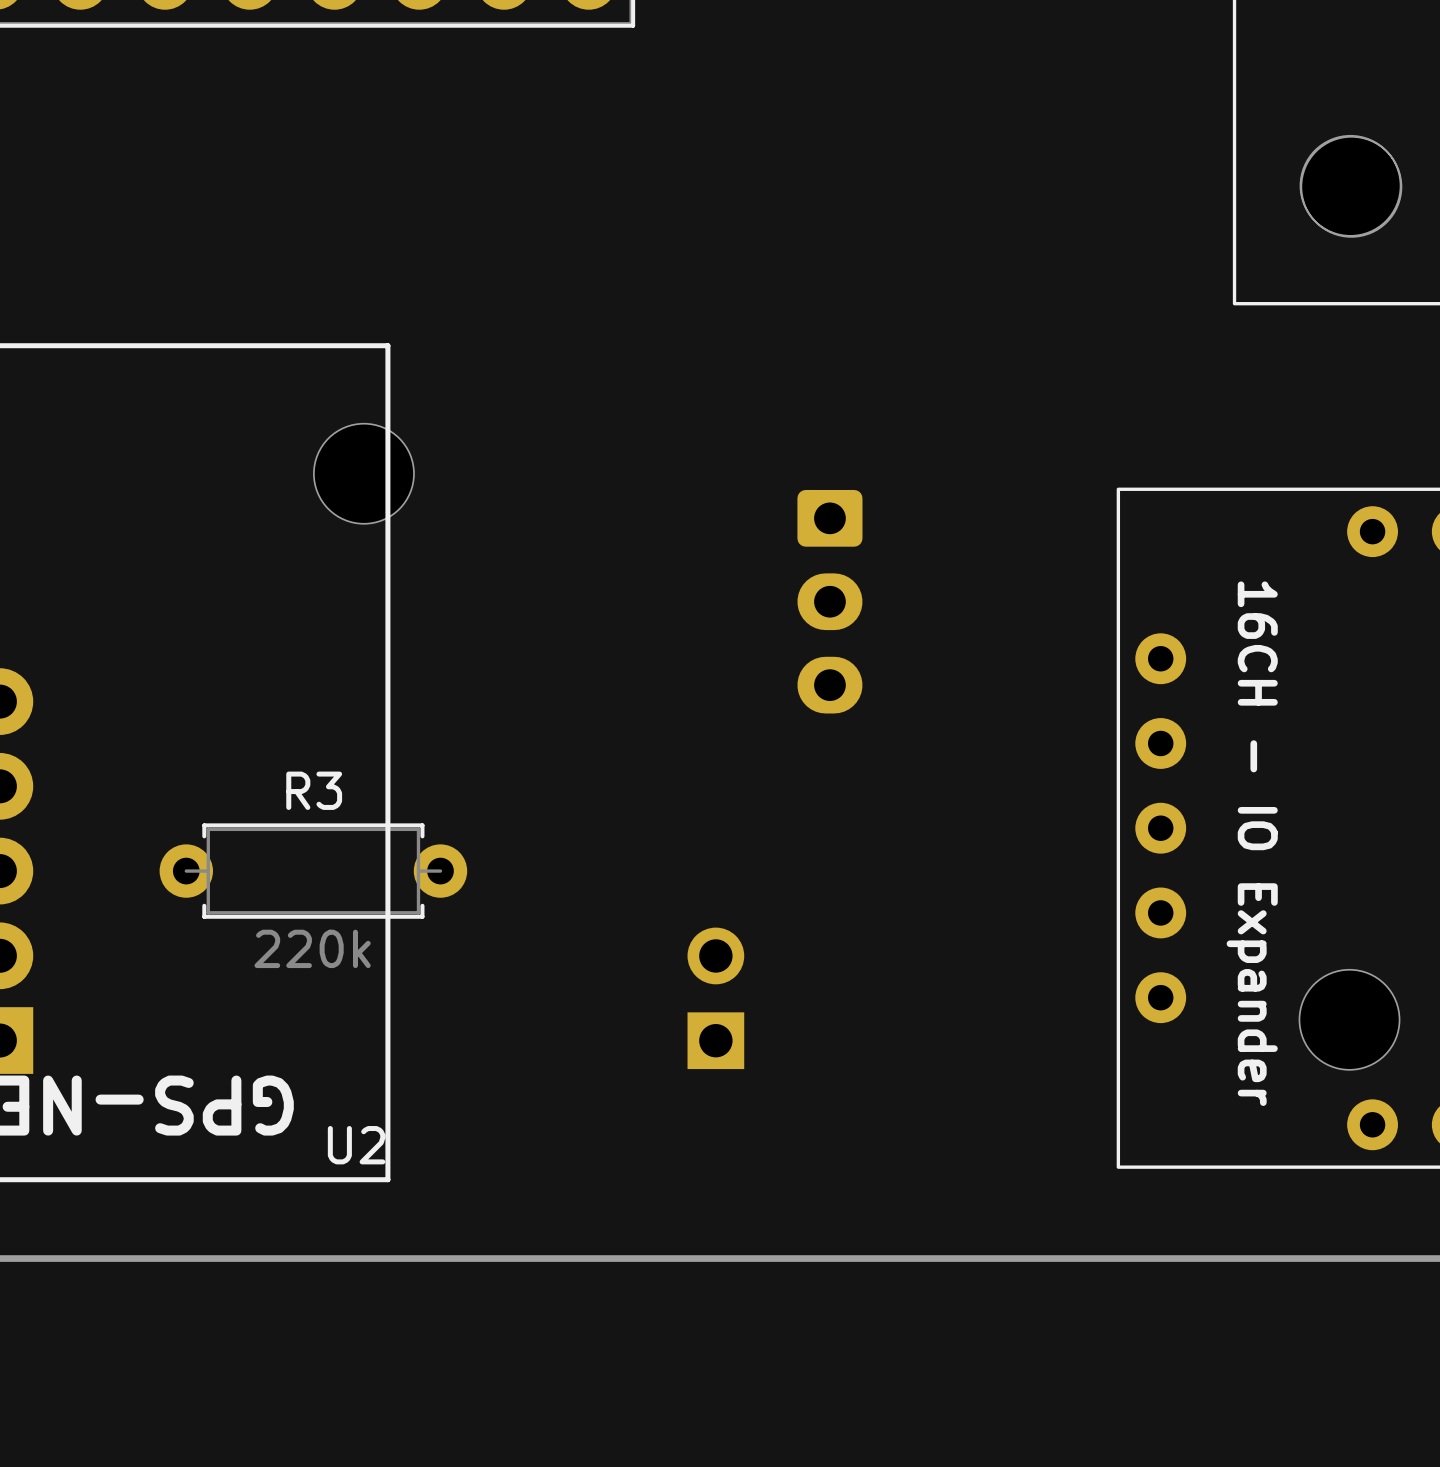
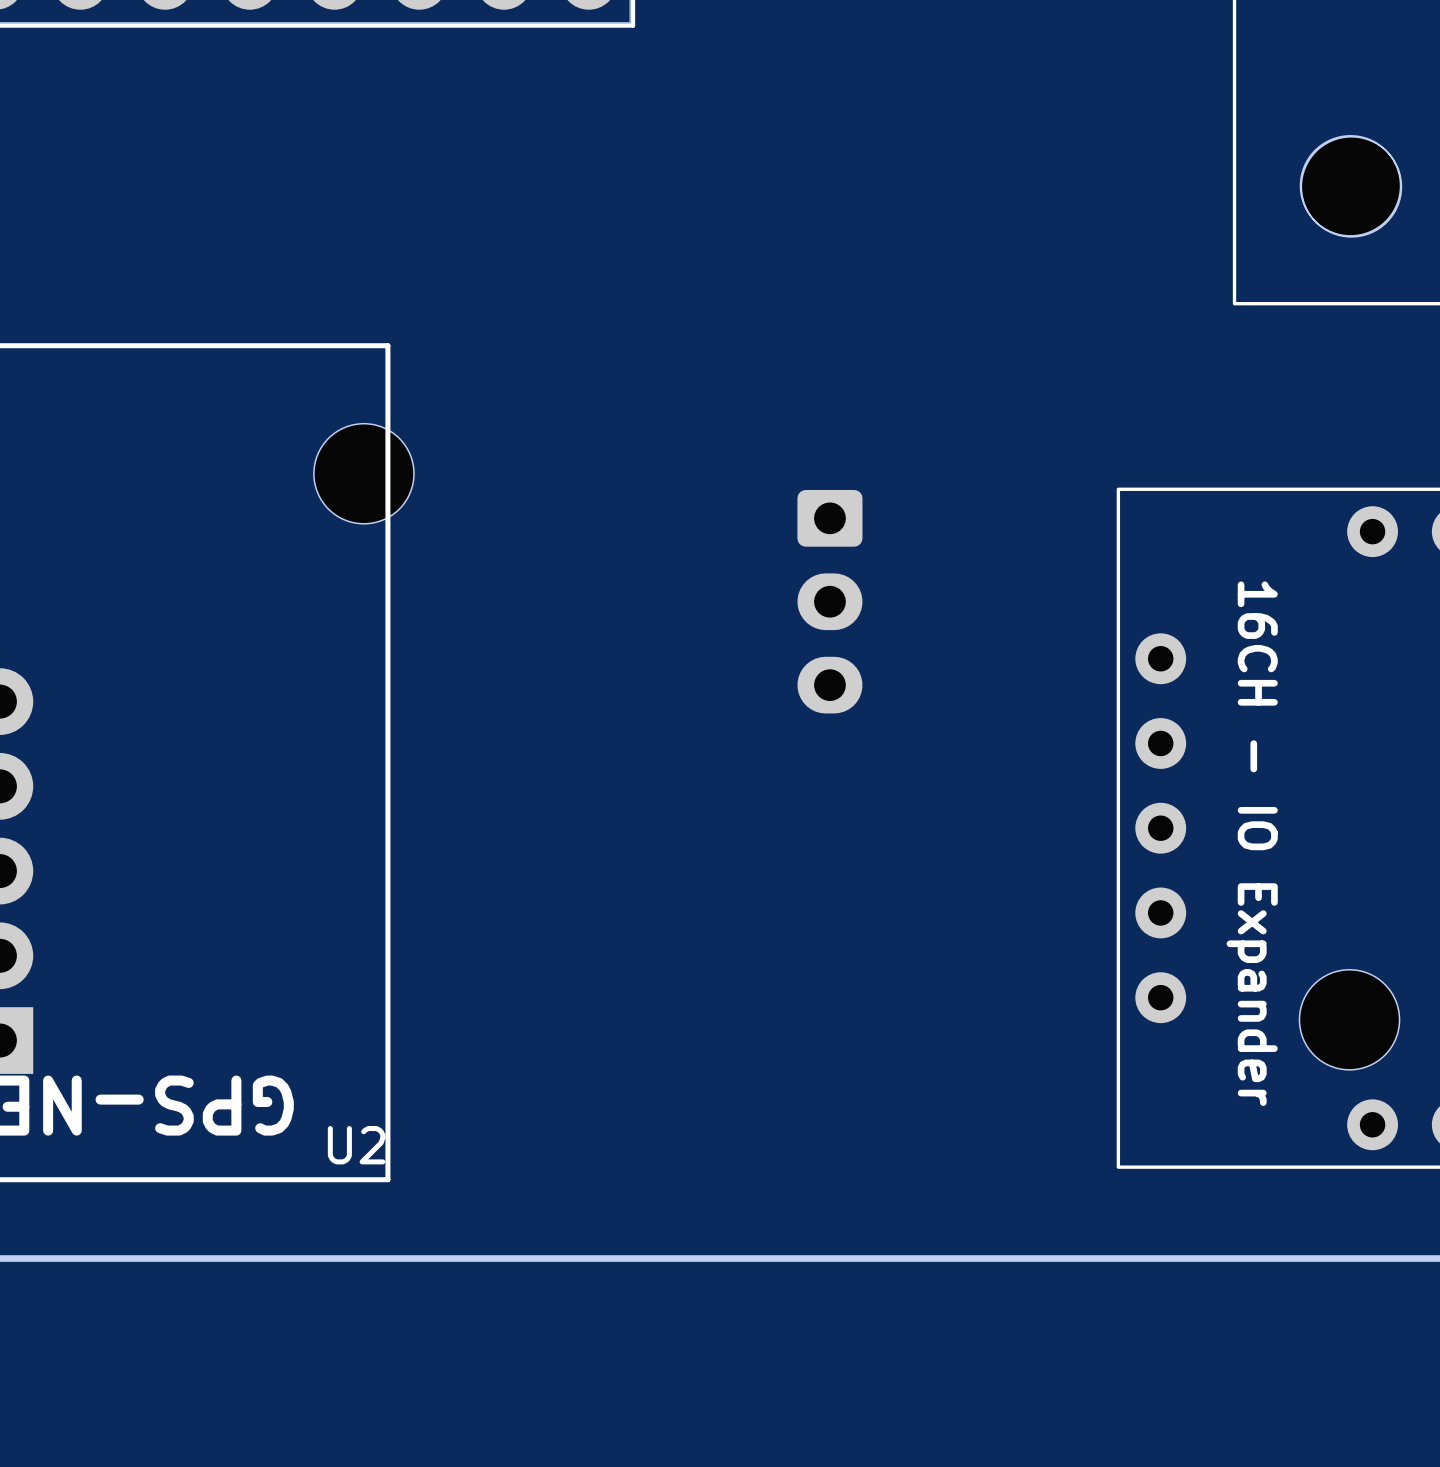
R3: 220k (313, 871) -> none
part: (715, 998) -> none

